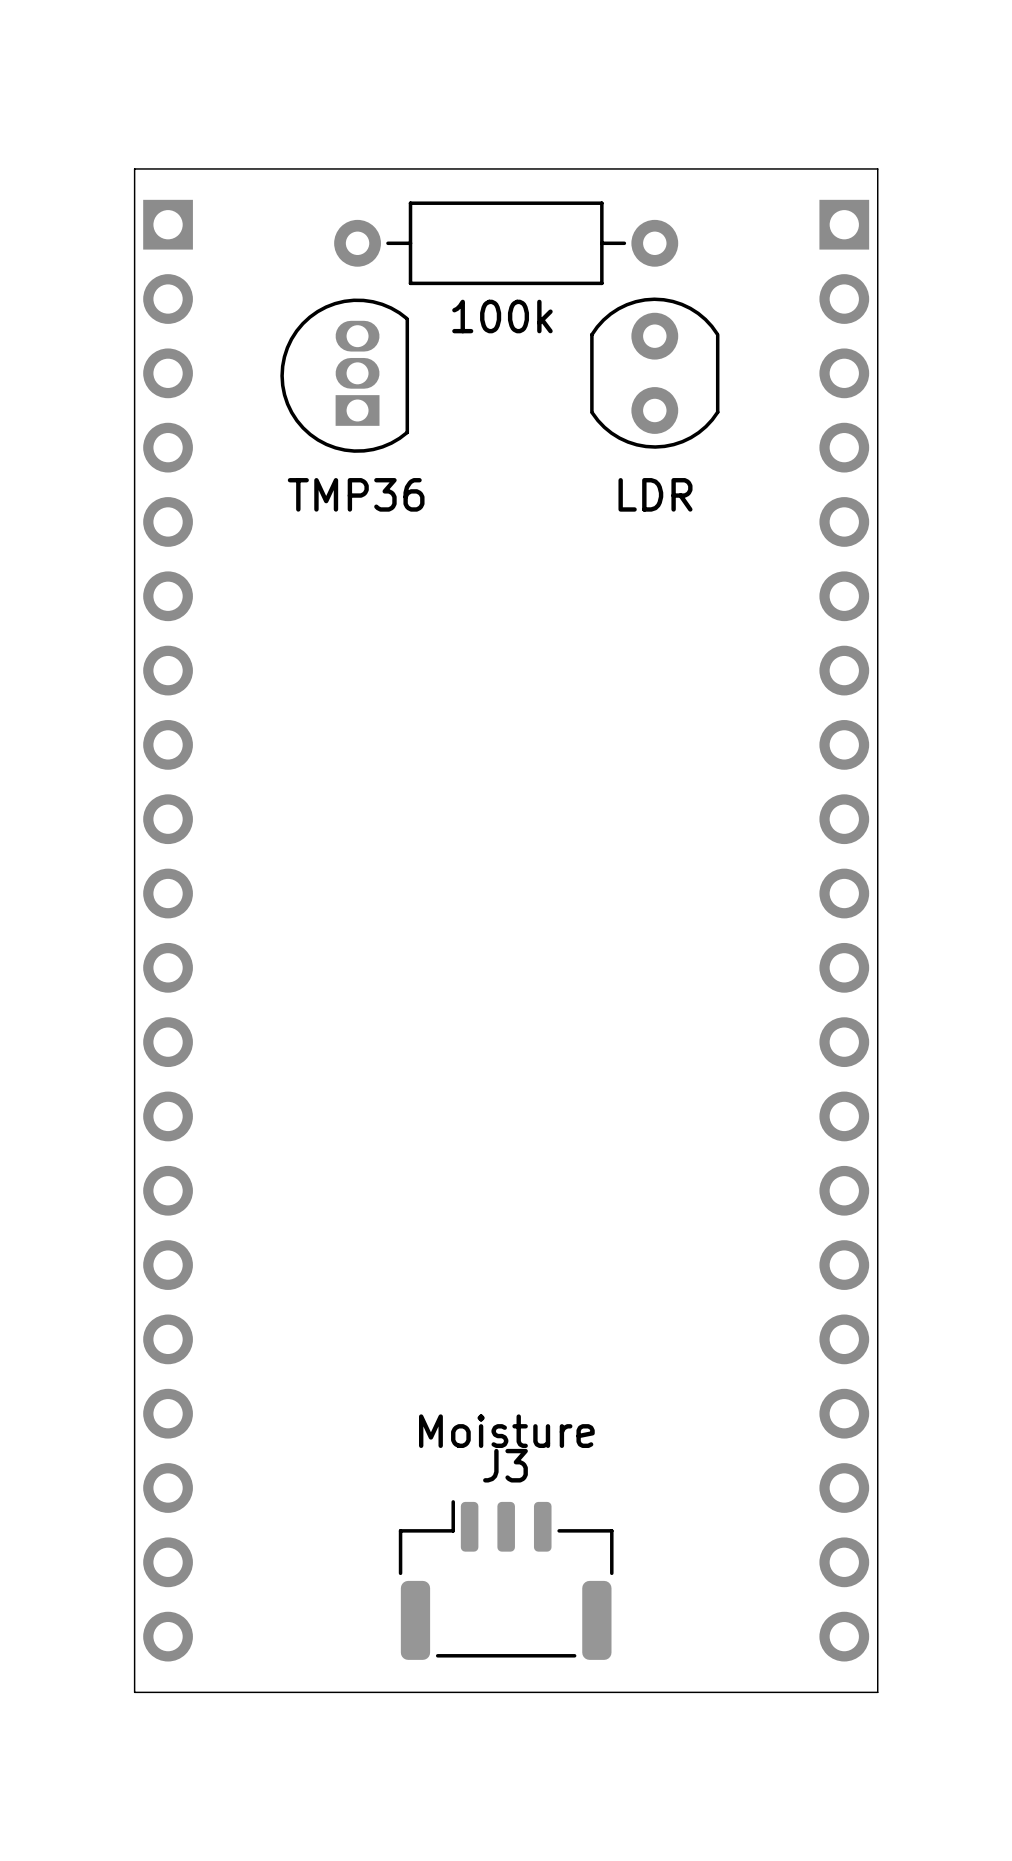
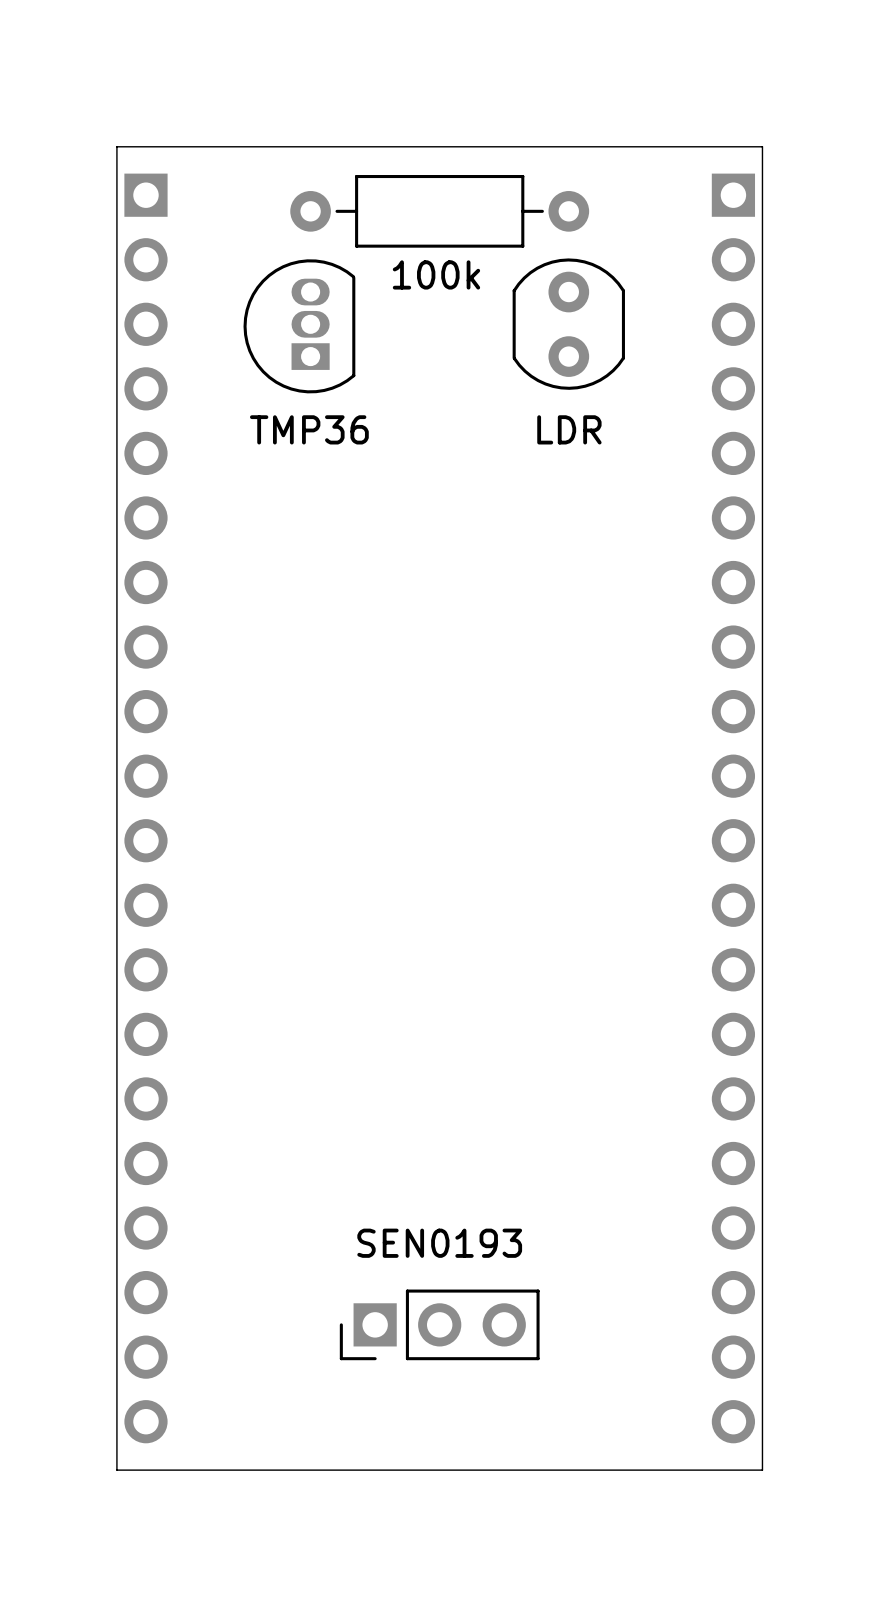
text: Moisture (506, 1431) -> SEN0193 (439, 1243)
part: none -> (439, 1324)
J3: (506, 1580) -> none

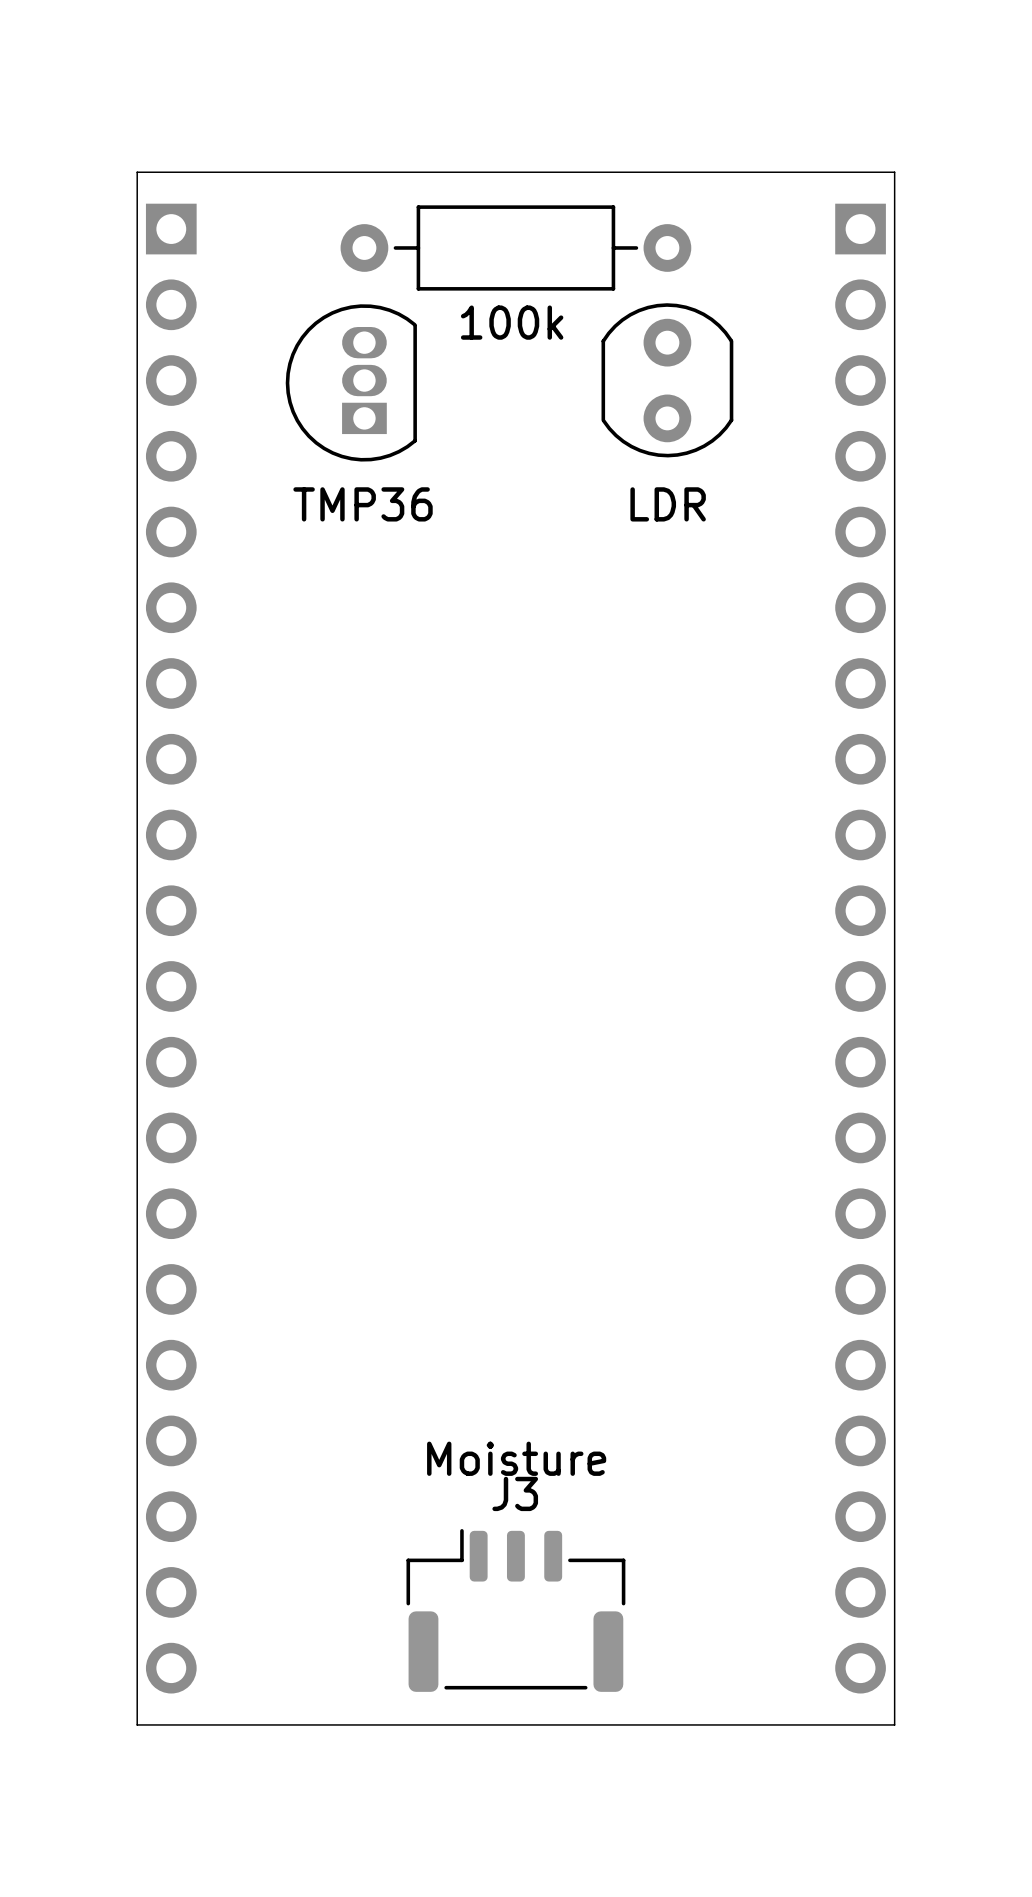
text: SEN0193 (439, 1243) -> Moisture (516, 1458)
part: (439, 1324) -> none
J3: none -> (515, 1610)

